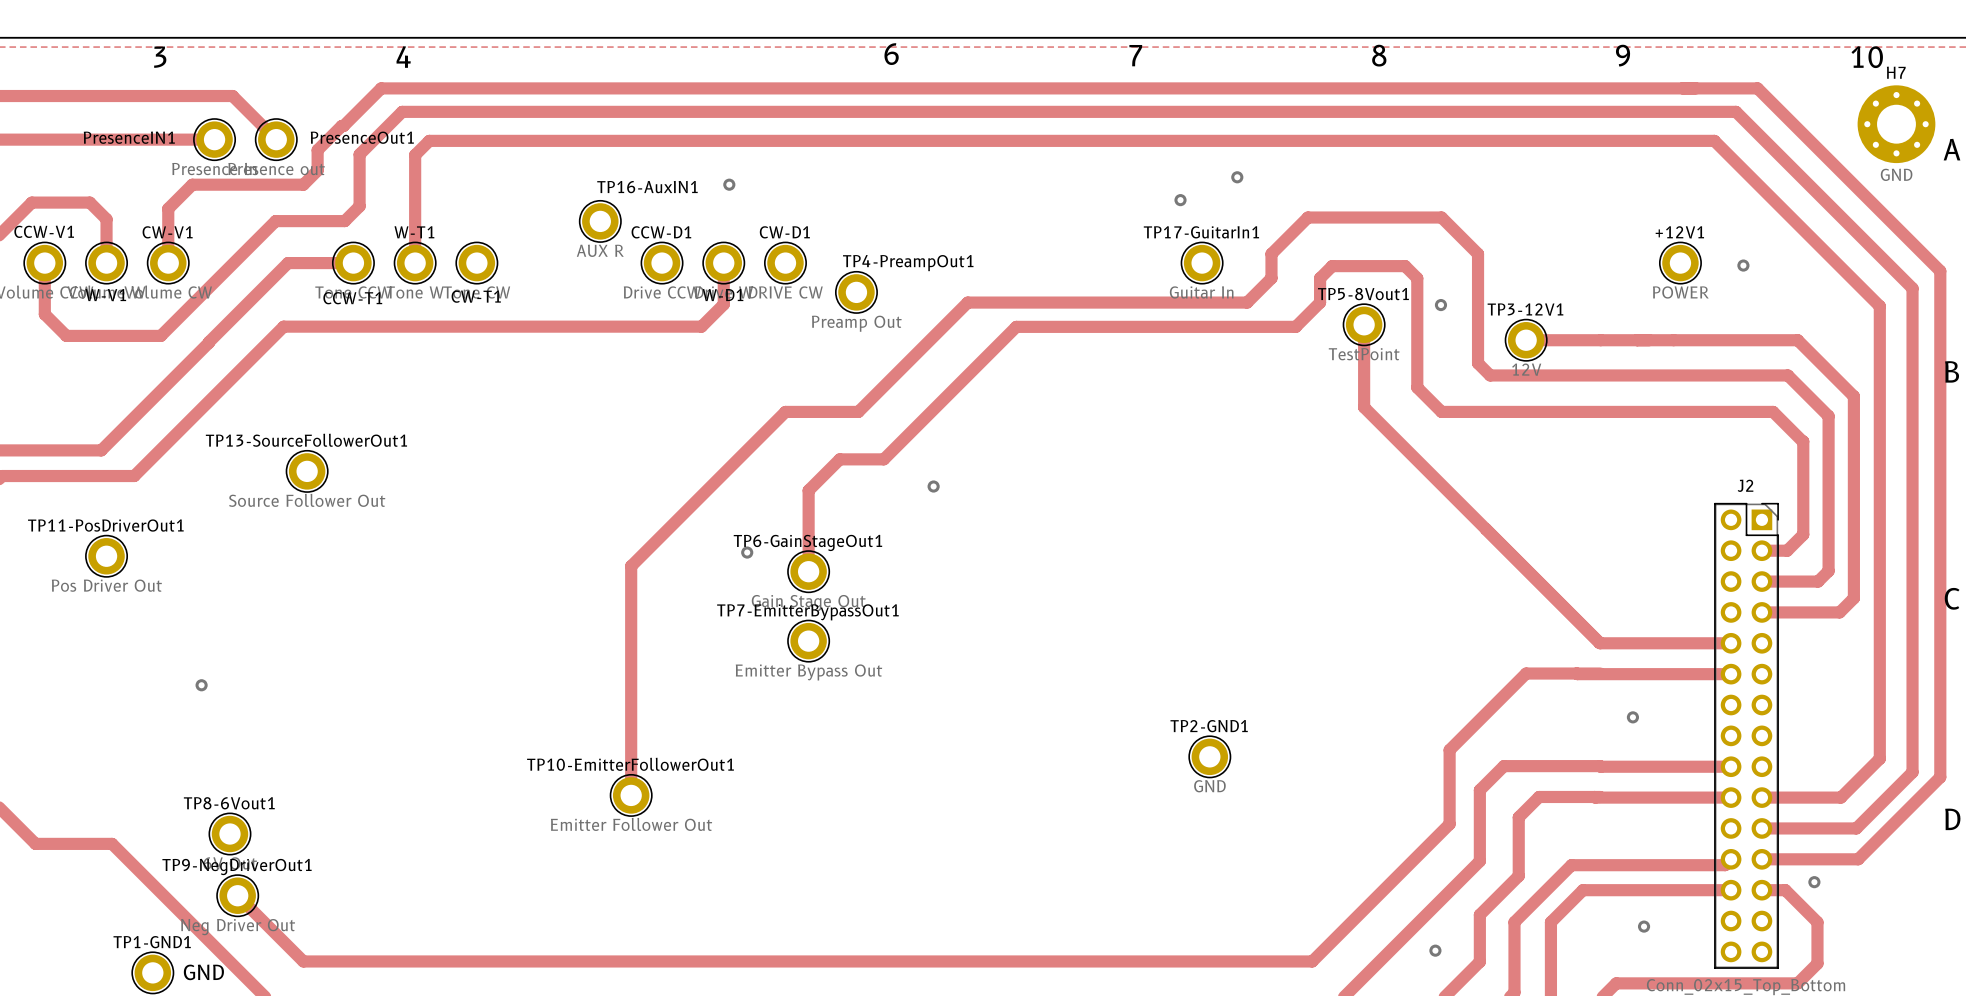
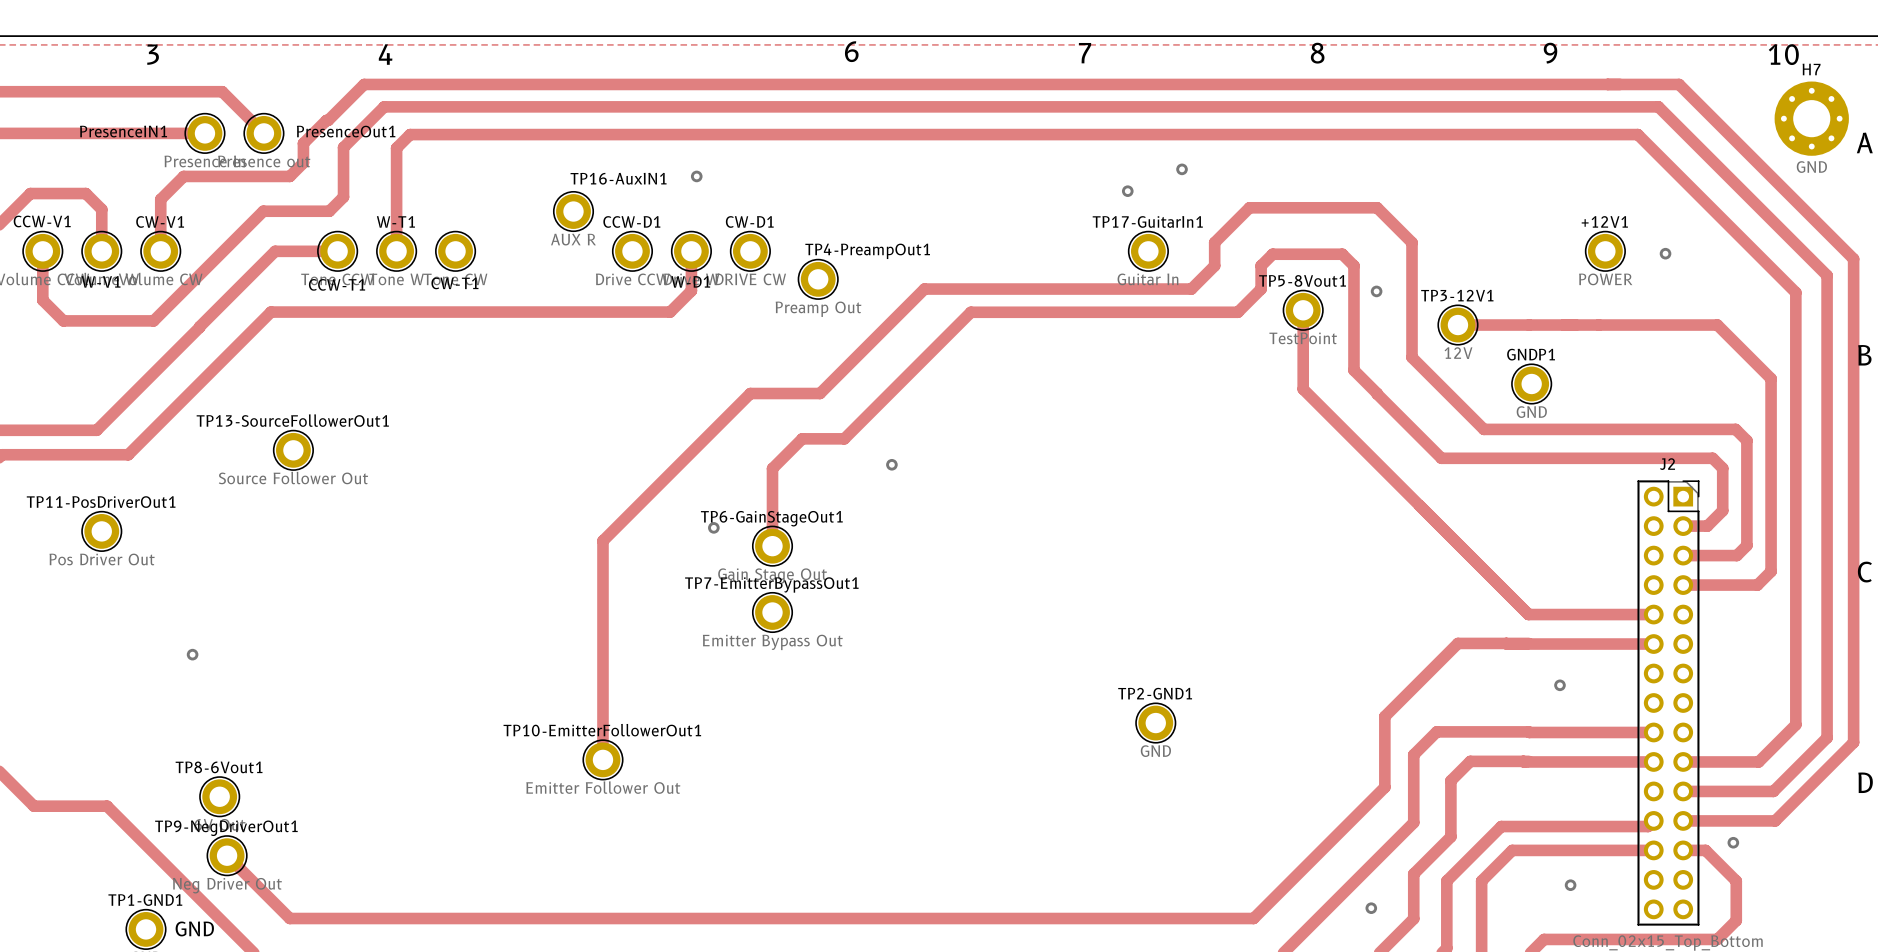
track: (1478, 363) (1490, 375) (1787, 375) (1828, 416) (1828, 461) -> (1412, 347) (1412, 357) (1483, 429) (1735, 429) (1746, 440)
GNDP1: none -> GND (1531, 383)
track: (1441, 411) (1773, 411) (1803, 441) (1803, 490) -> (1377, 393) (1441, 458) (1712, 458) (1722, 468)

